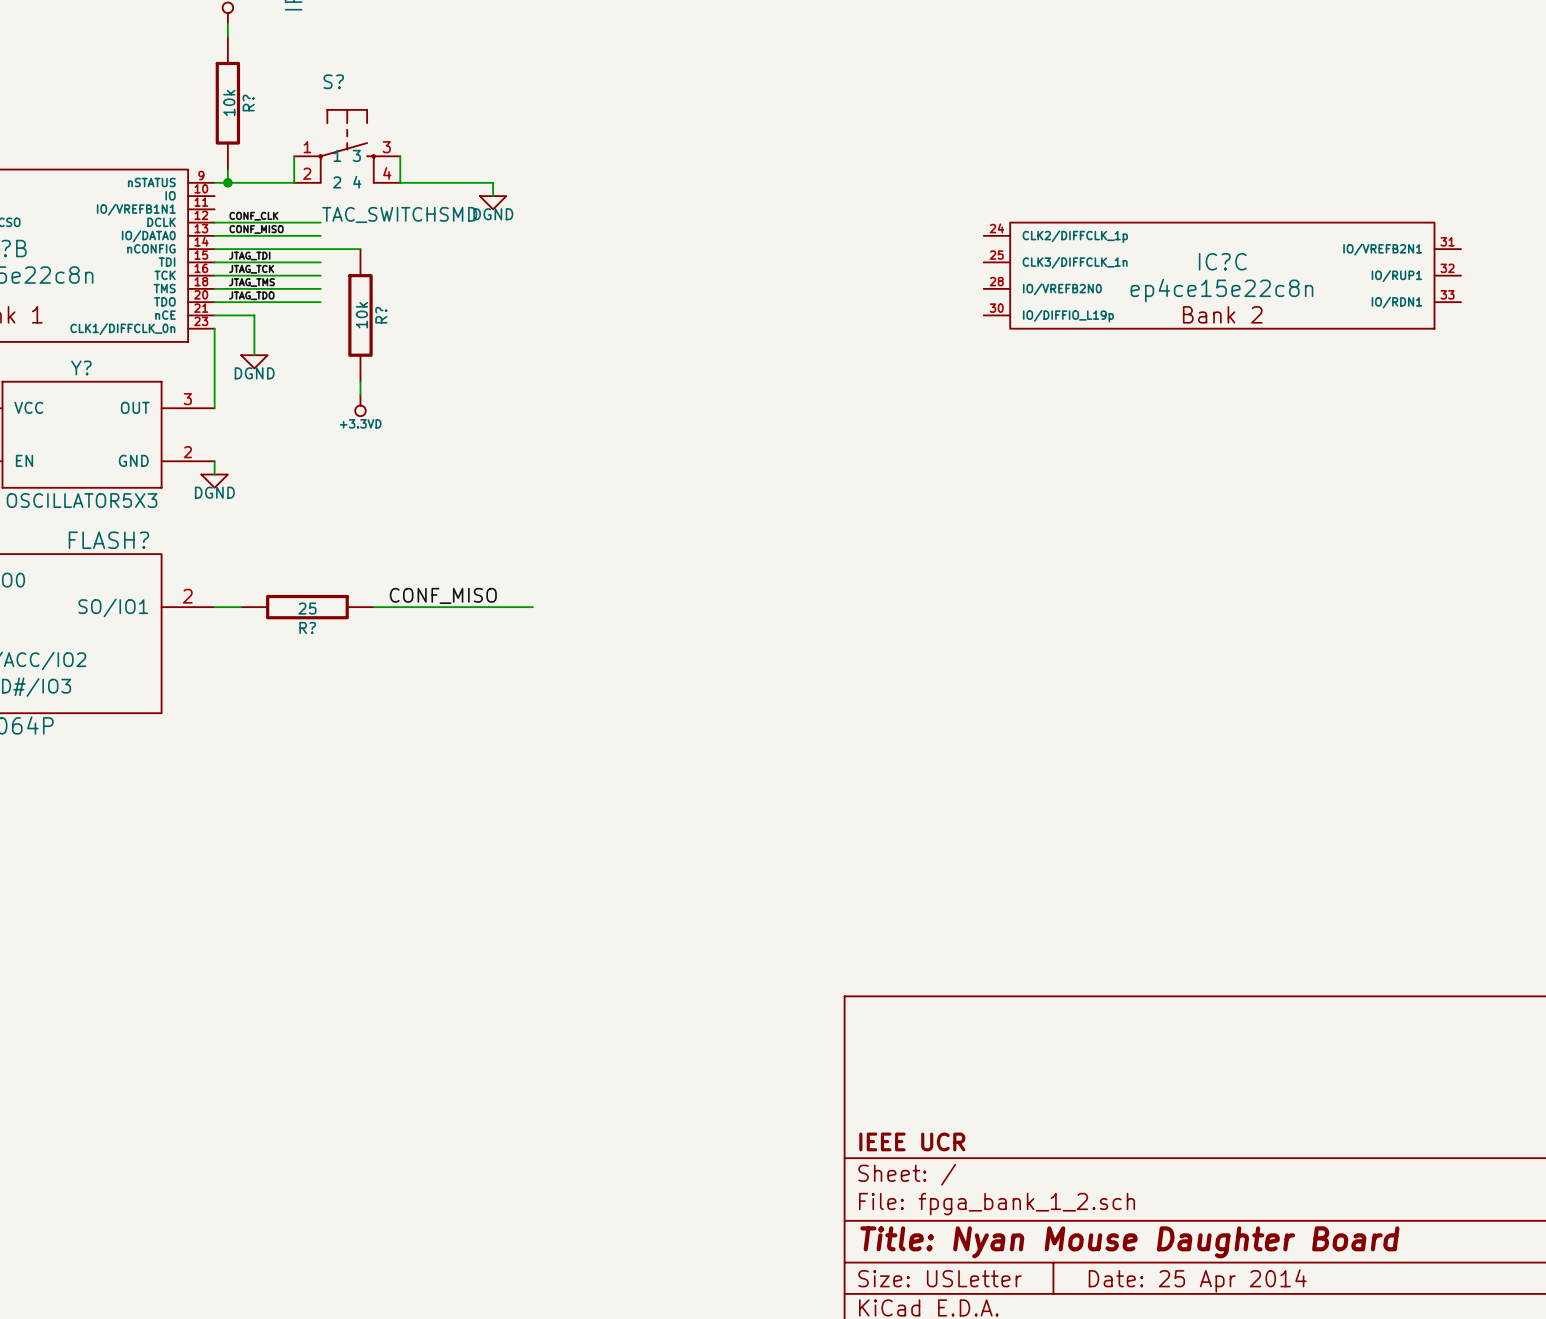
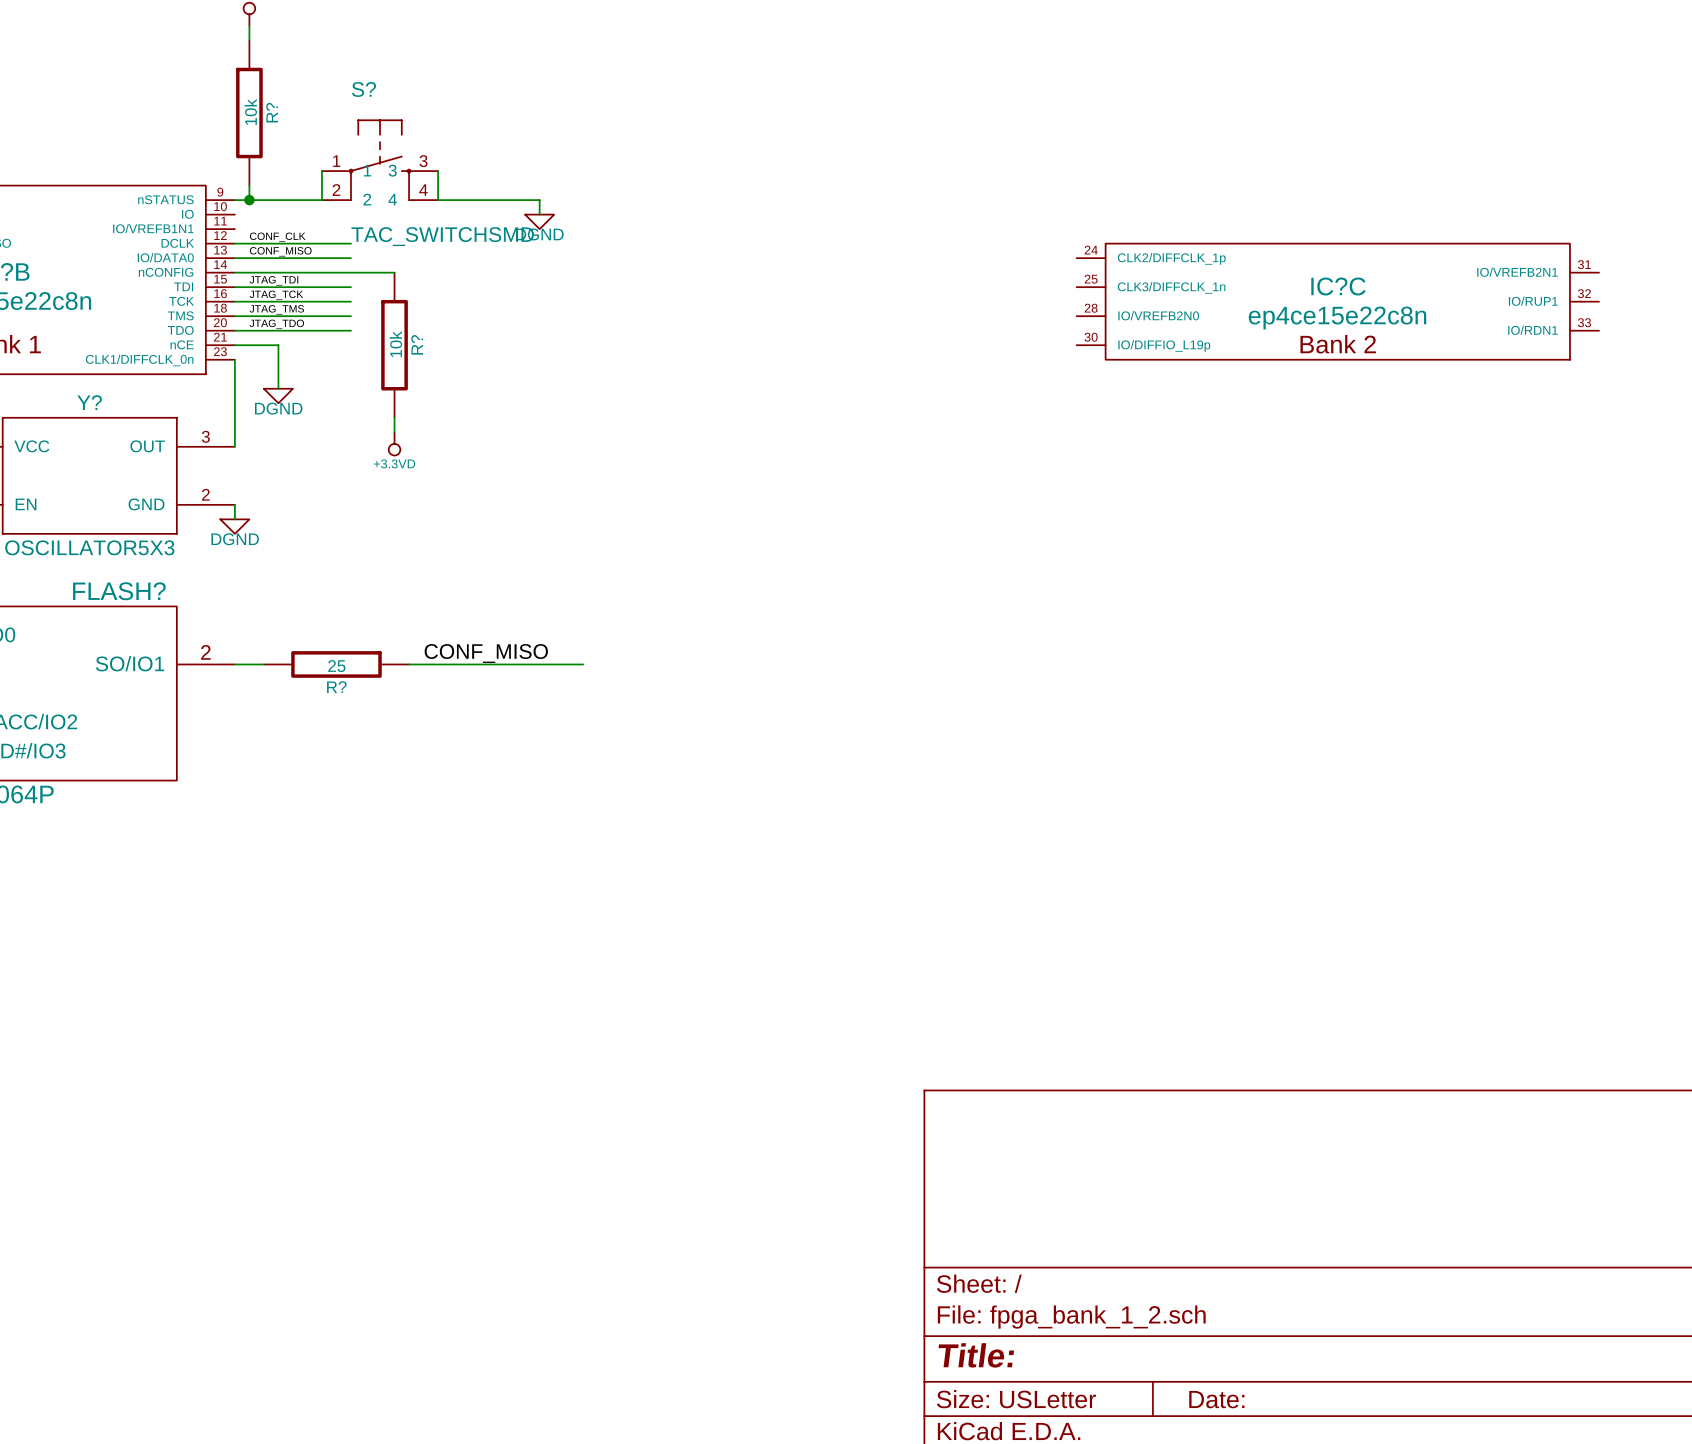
title block: IEEE UCR (912, 1141) -> none
title block: Title: Nyan Mouse Daughter Board (1129, 1242) -> Title: (976, 1355)
title block: Date: 25 Apr 2014 (1197, 1280) -> Date: (1216, 1399)

